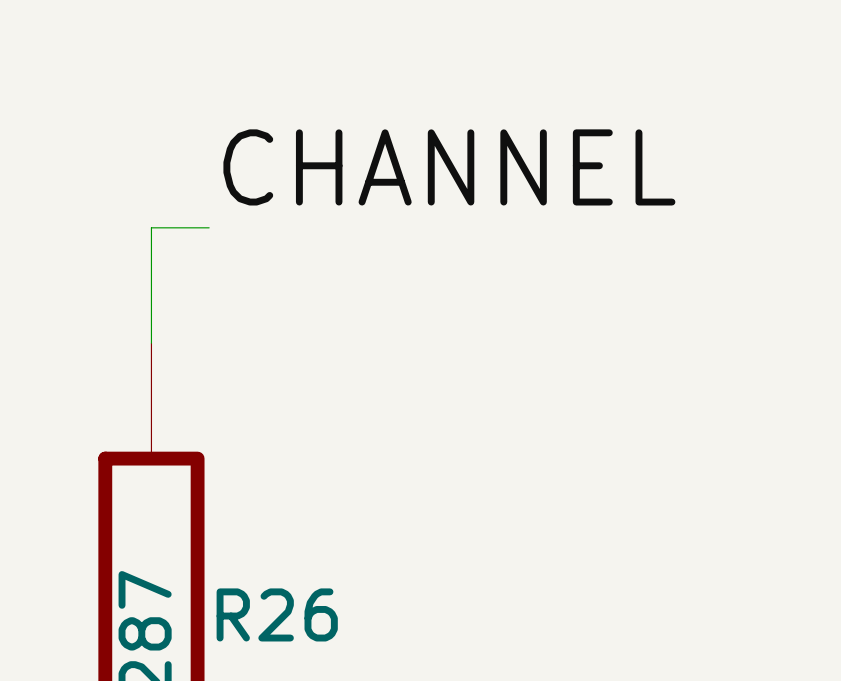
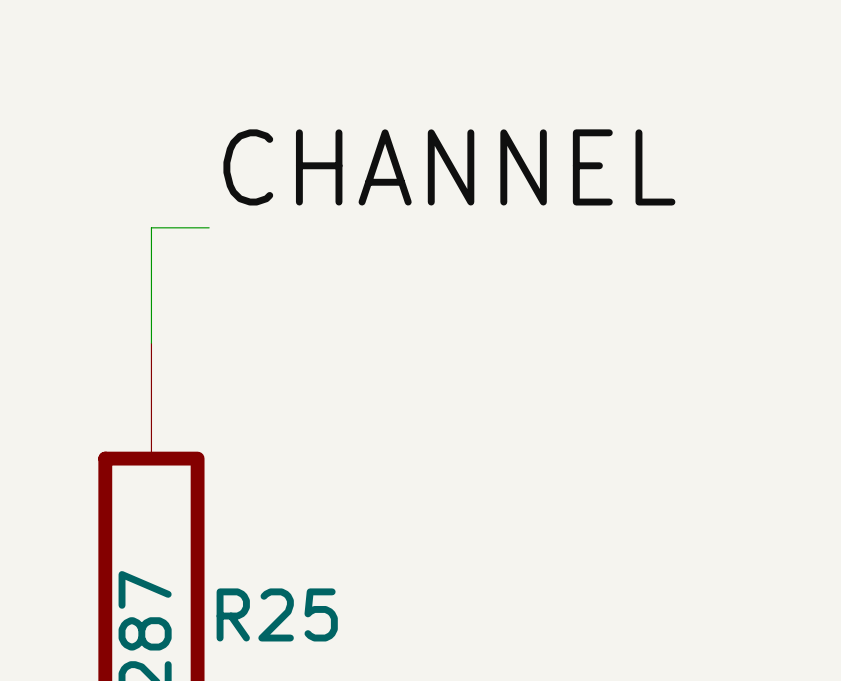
R26 name: R26 (277, 614) -> R25 (277, 614)

